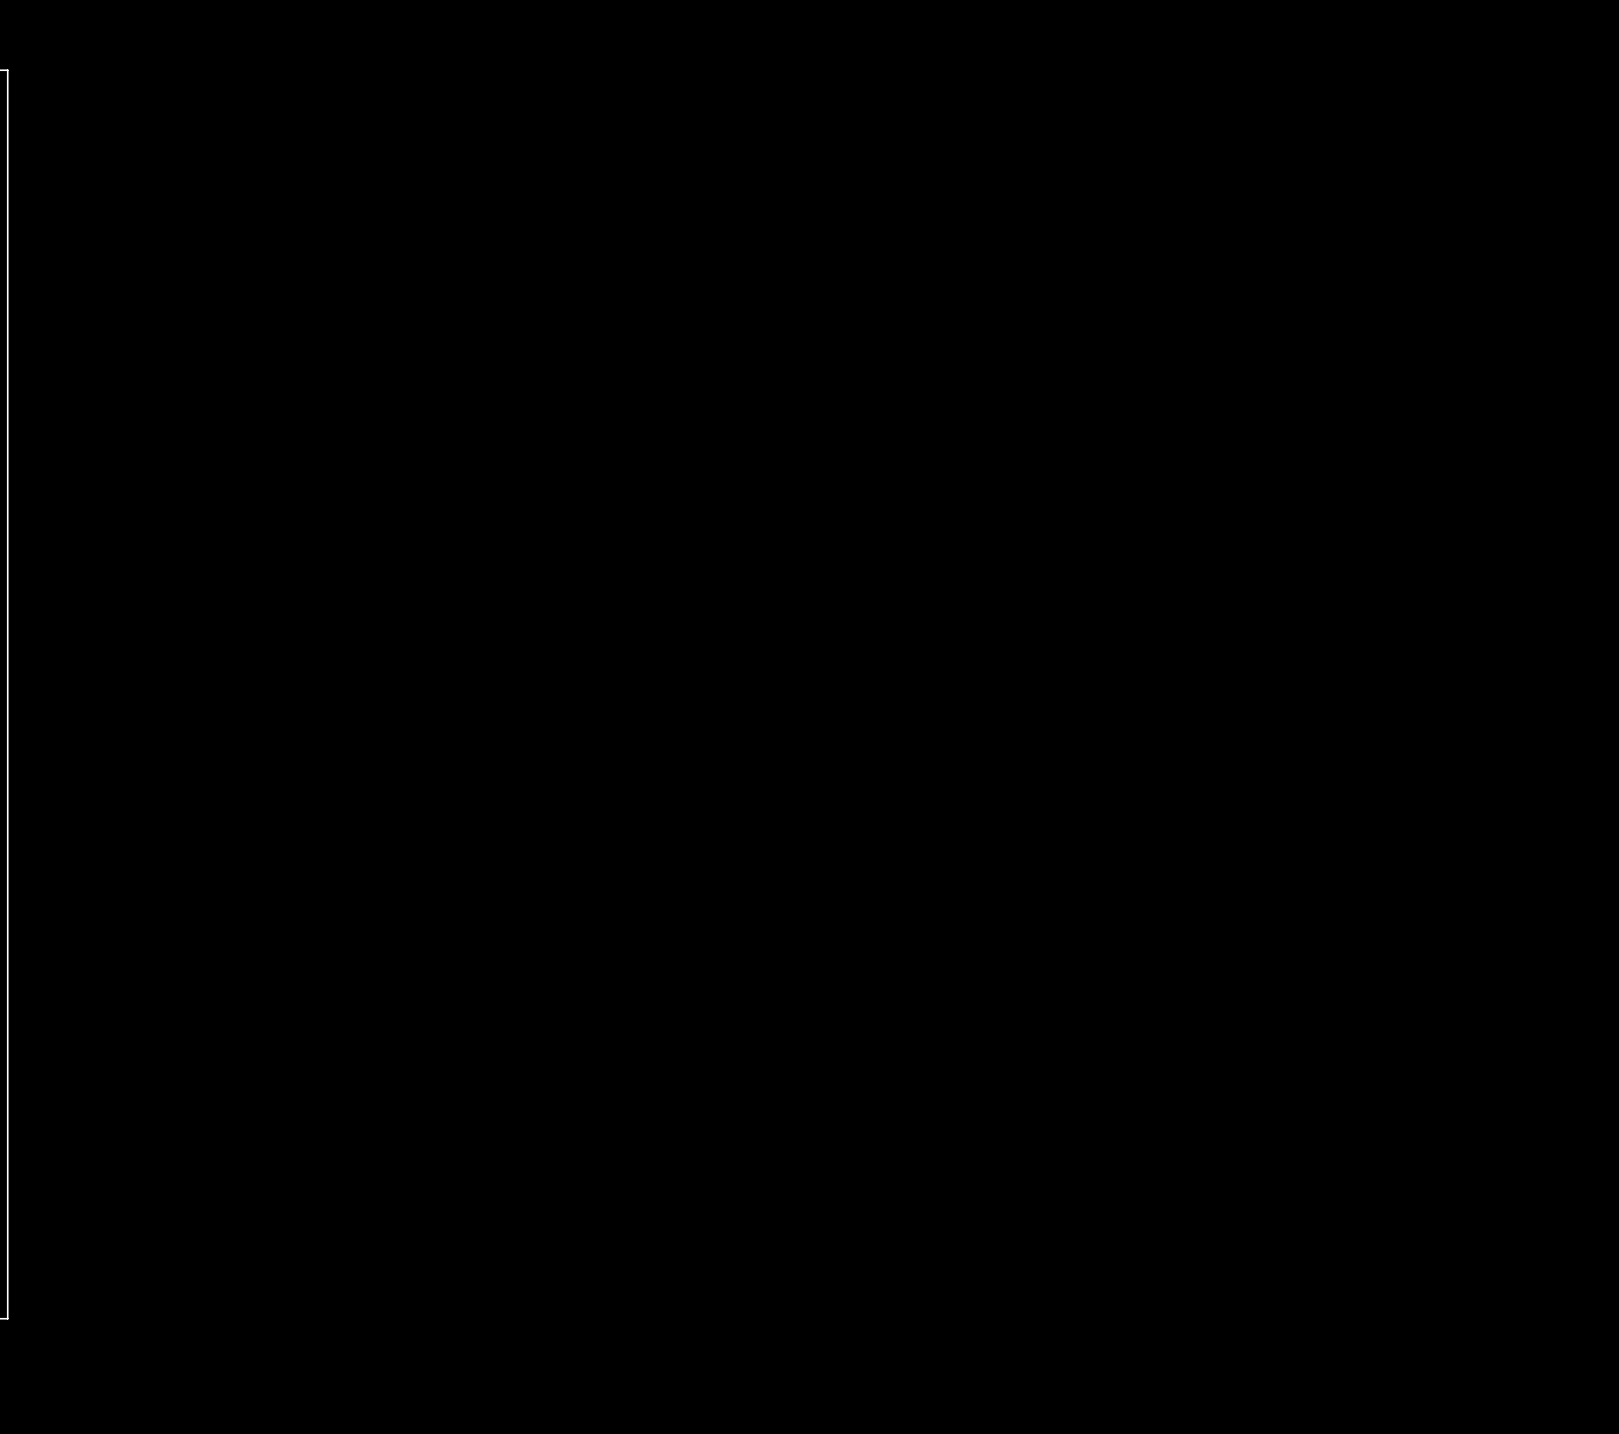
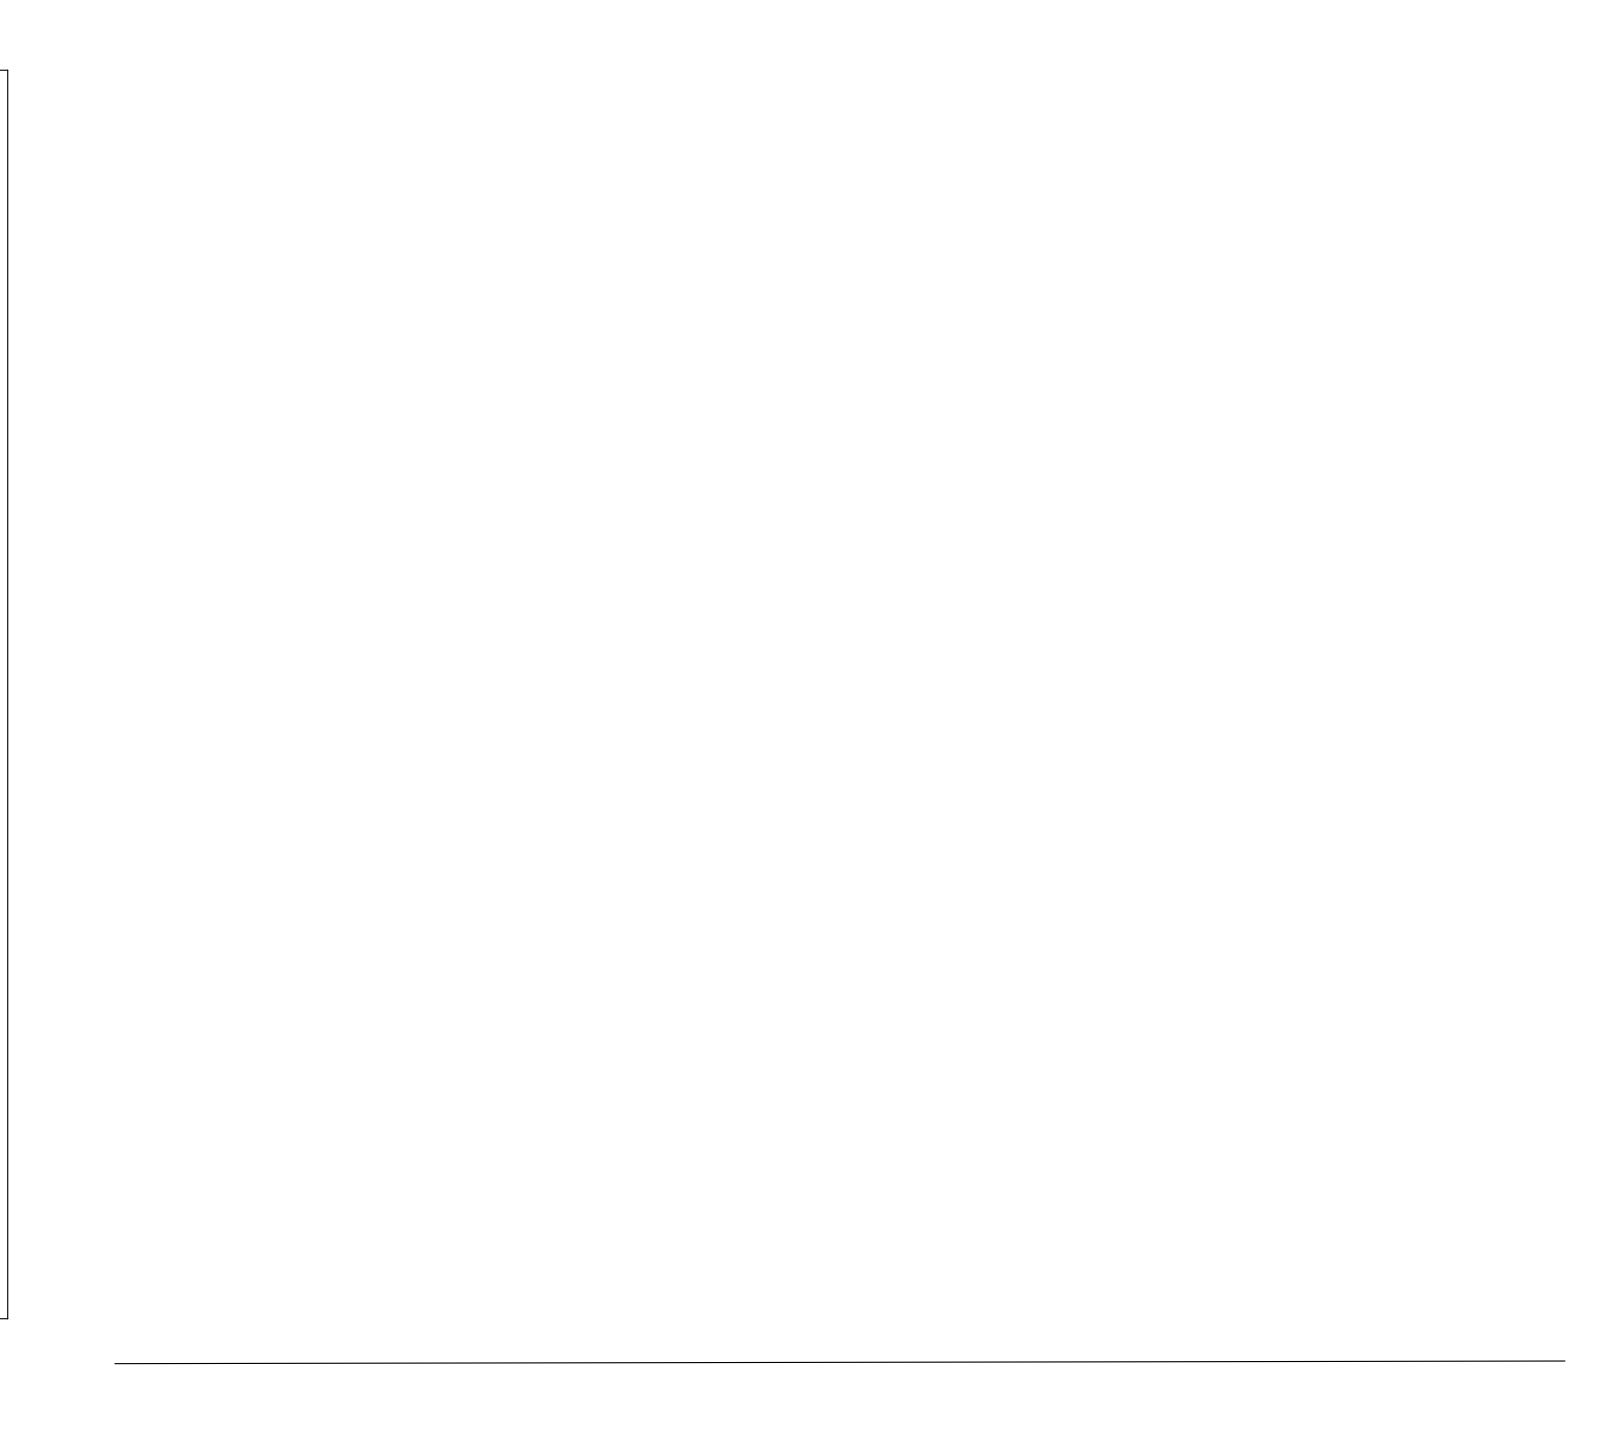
board edge: none -> (1564, 1361) (114, 1363)

